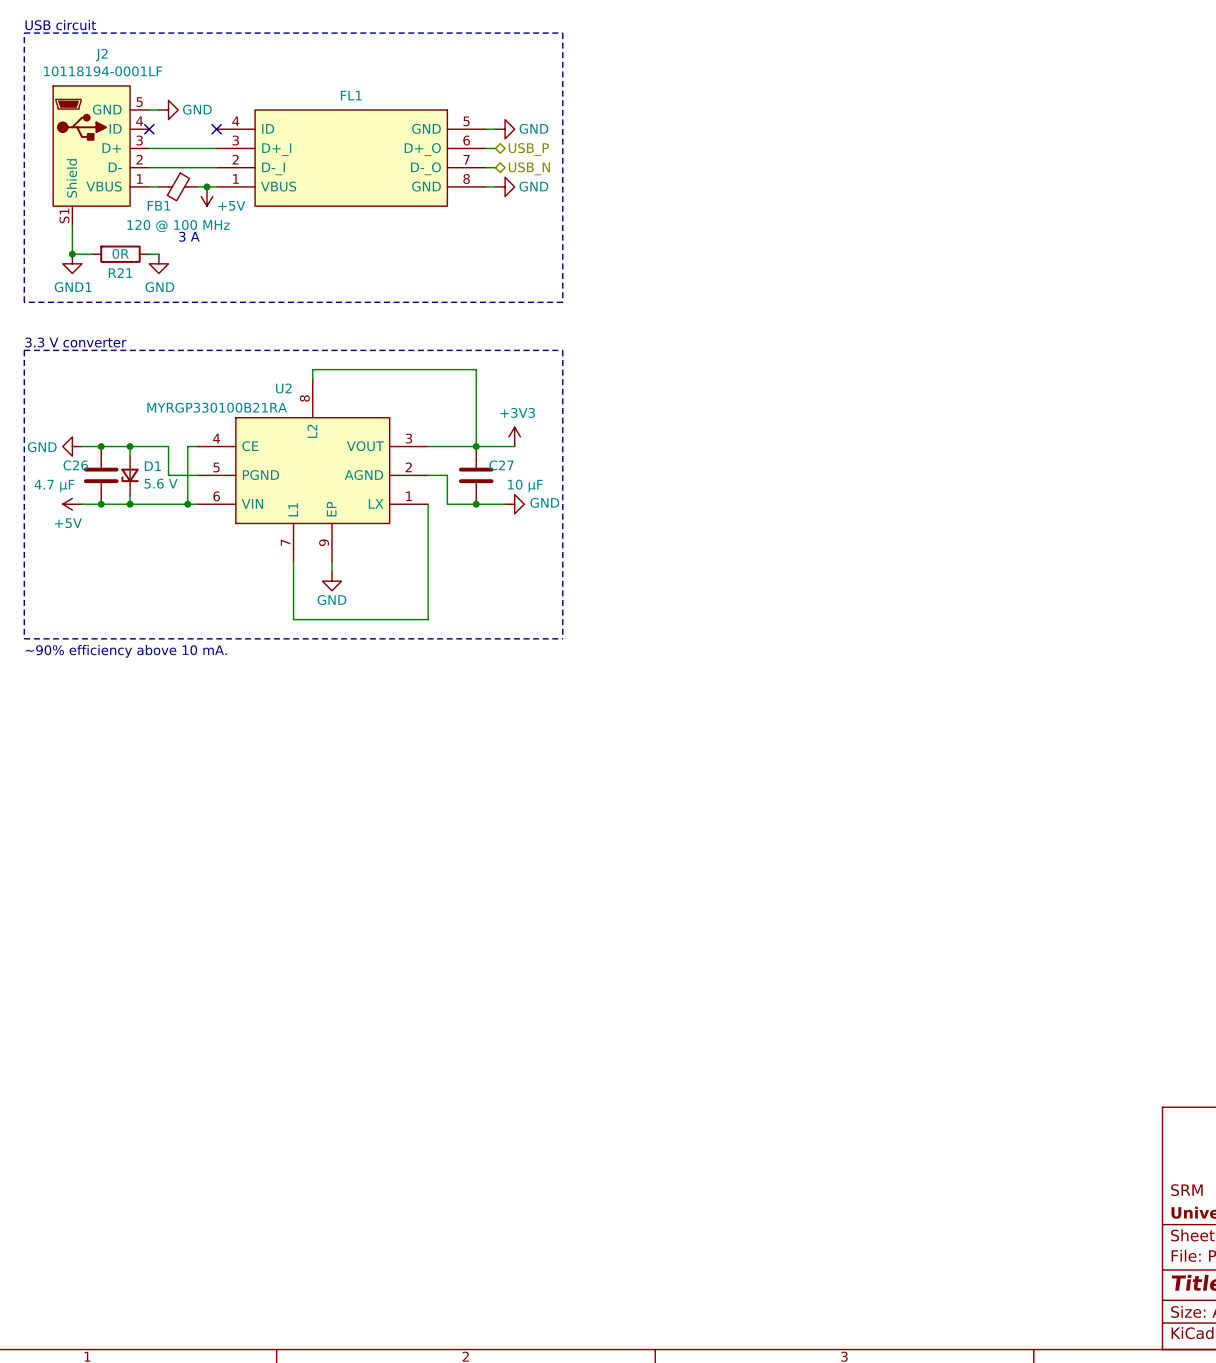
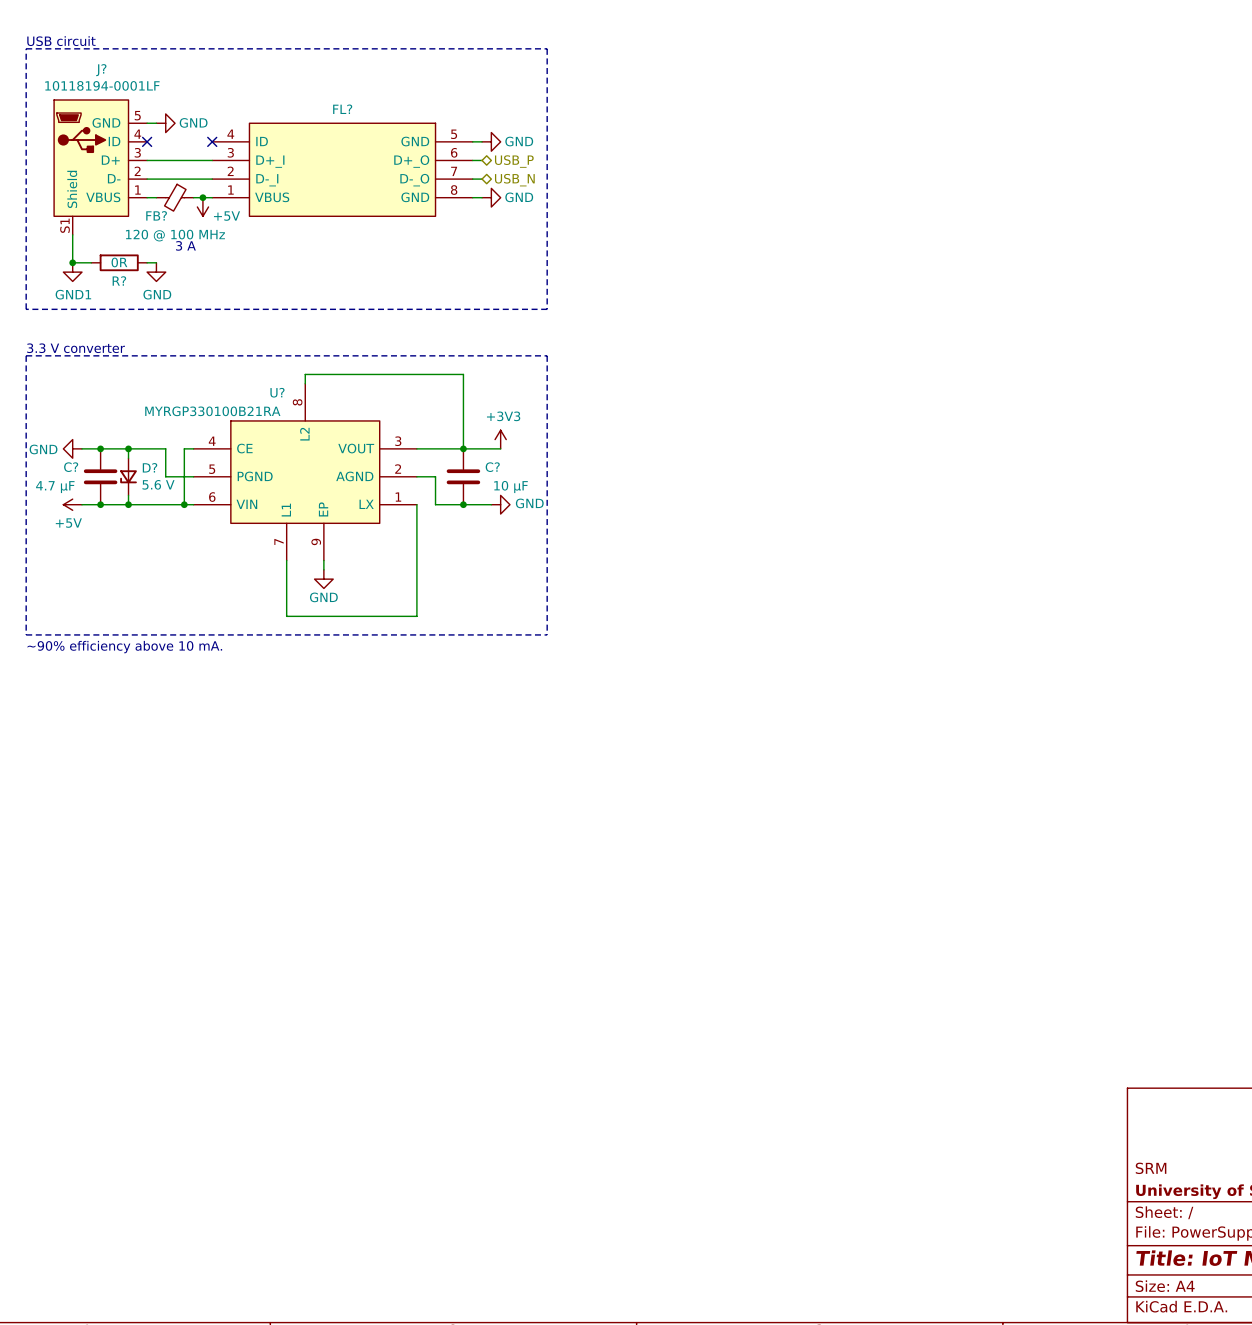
J2 name: J2 (101, 55) -> J? (101, 70)
FL1 name: FL1 (351, 95) -> FL? (342, 109)
FB1 name: FB1 (158, 205) -> FB? (156, 215)
R21 name: R21 (120, 273) -> R? (119, 280)
U2 name: U2 (283, 388) -> U? (277, 392)
C26 name: C26 (75, 465) -> C? (71, 467)
C27 name: C27 (501, 465) -> C? (492, 467)
D1 name: D1 (152, 466) -> D? (150, 467)

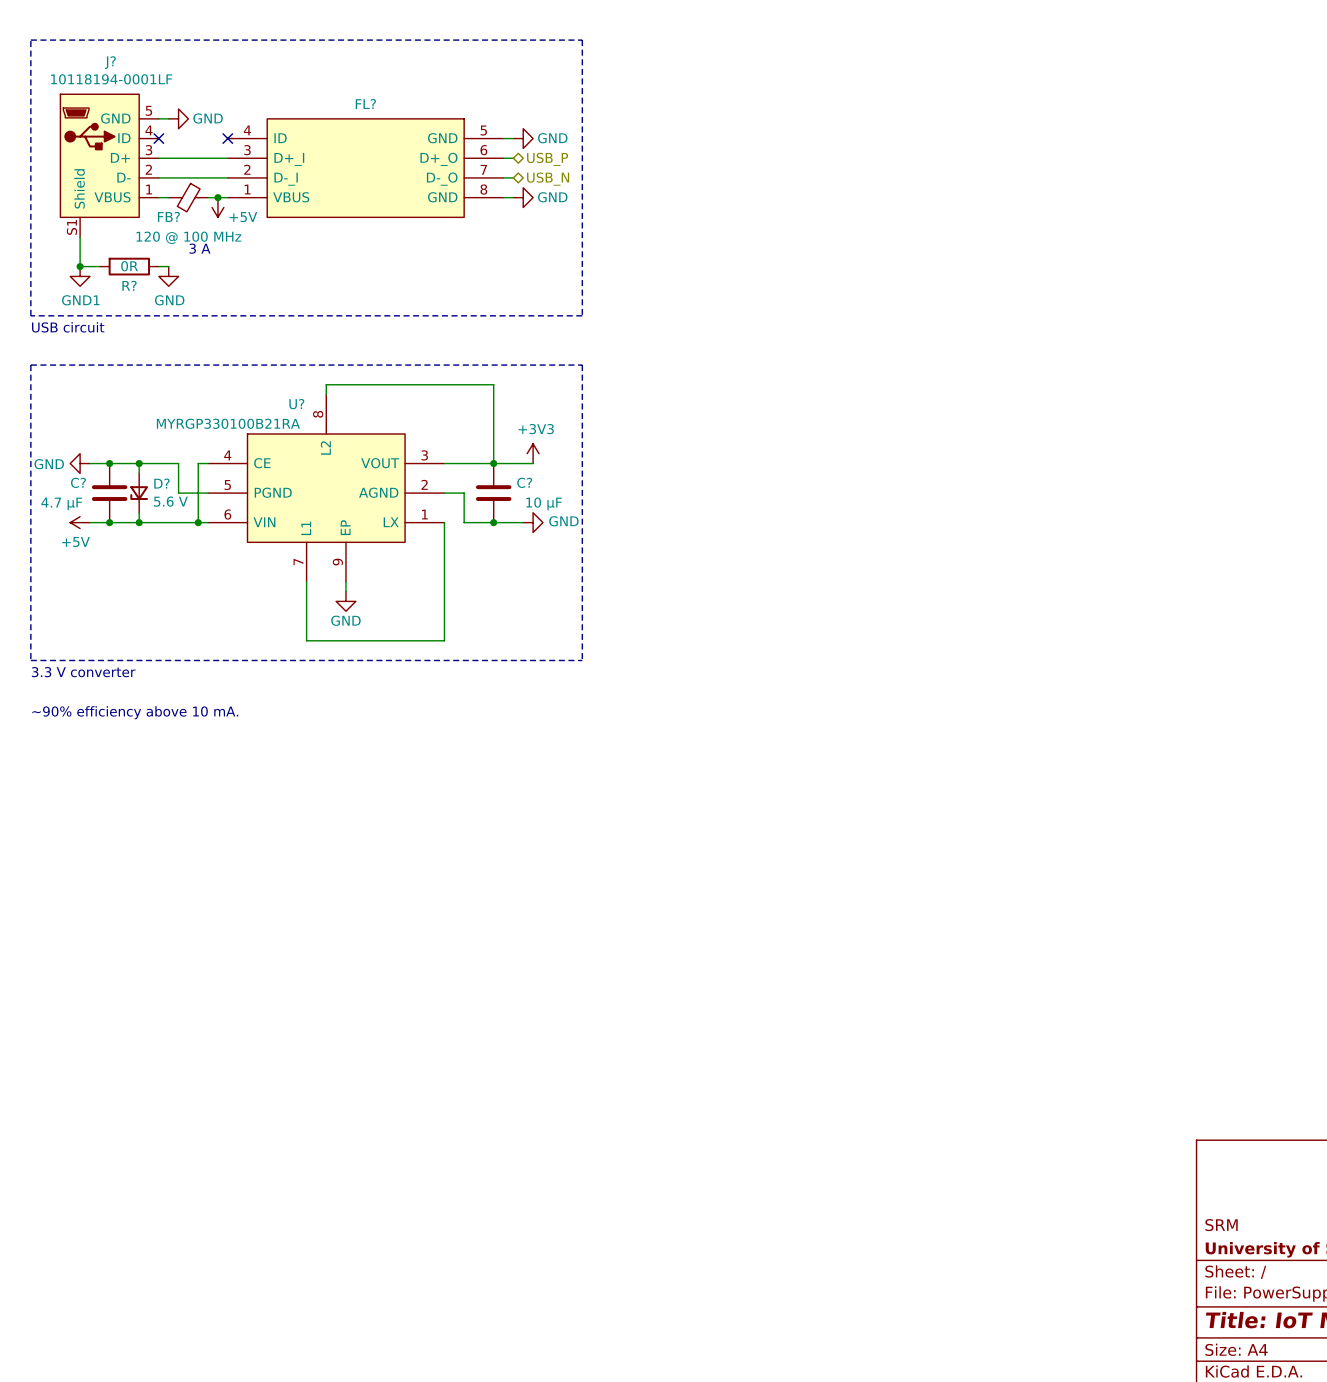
text: USB circuit (61, 41) -> none
text: none -> USB circuit (68, 327)
text: 3.3 V converter (76, 348) -> none
text: ~90% efficiency above 10 mA. (124, 647) -> 3.3 V converter (83, 672)
text: none -> ~90% efficiency above 10 mA. (135, 712)

